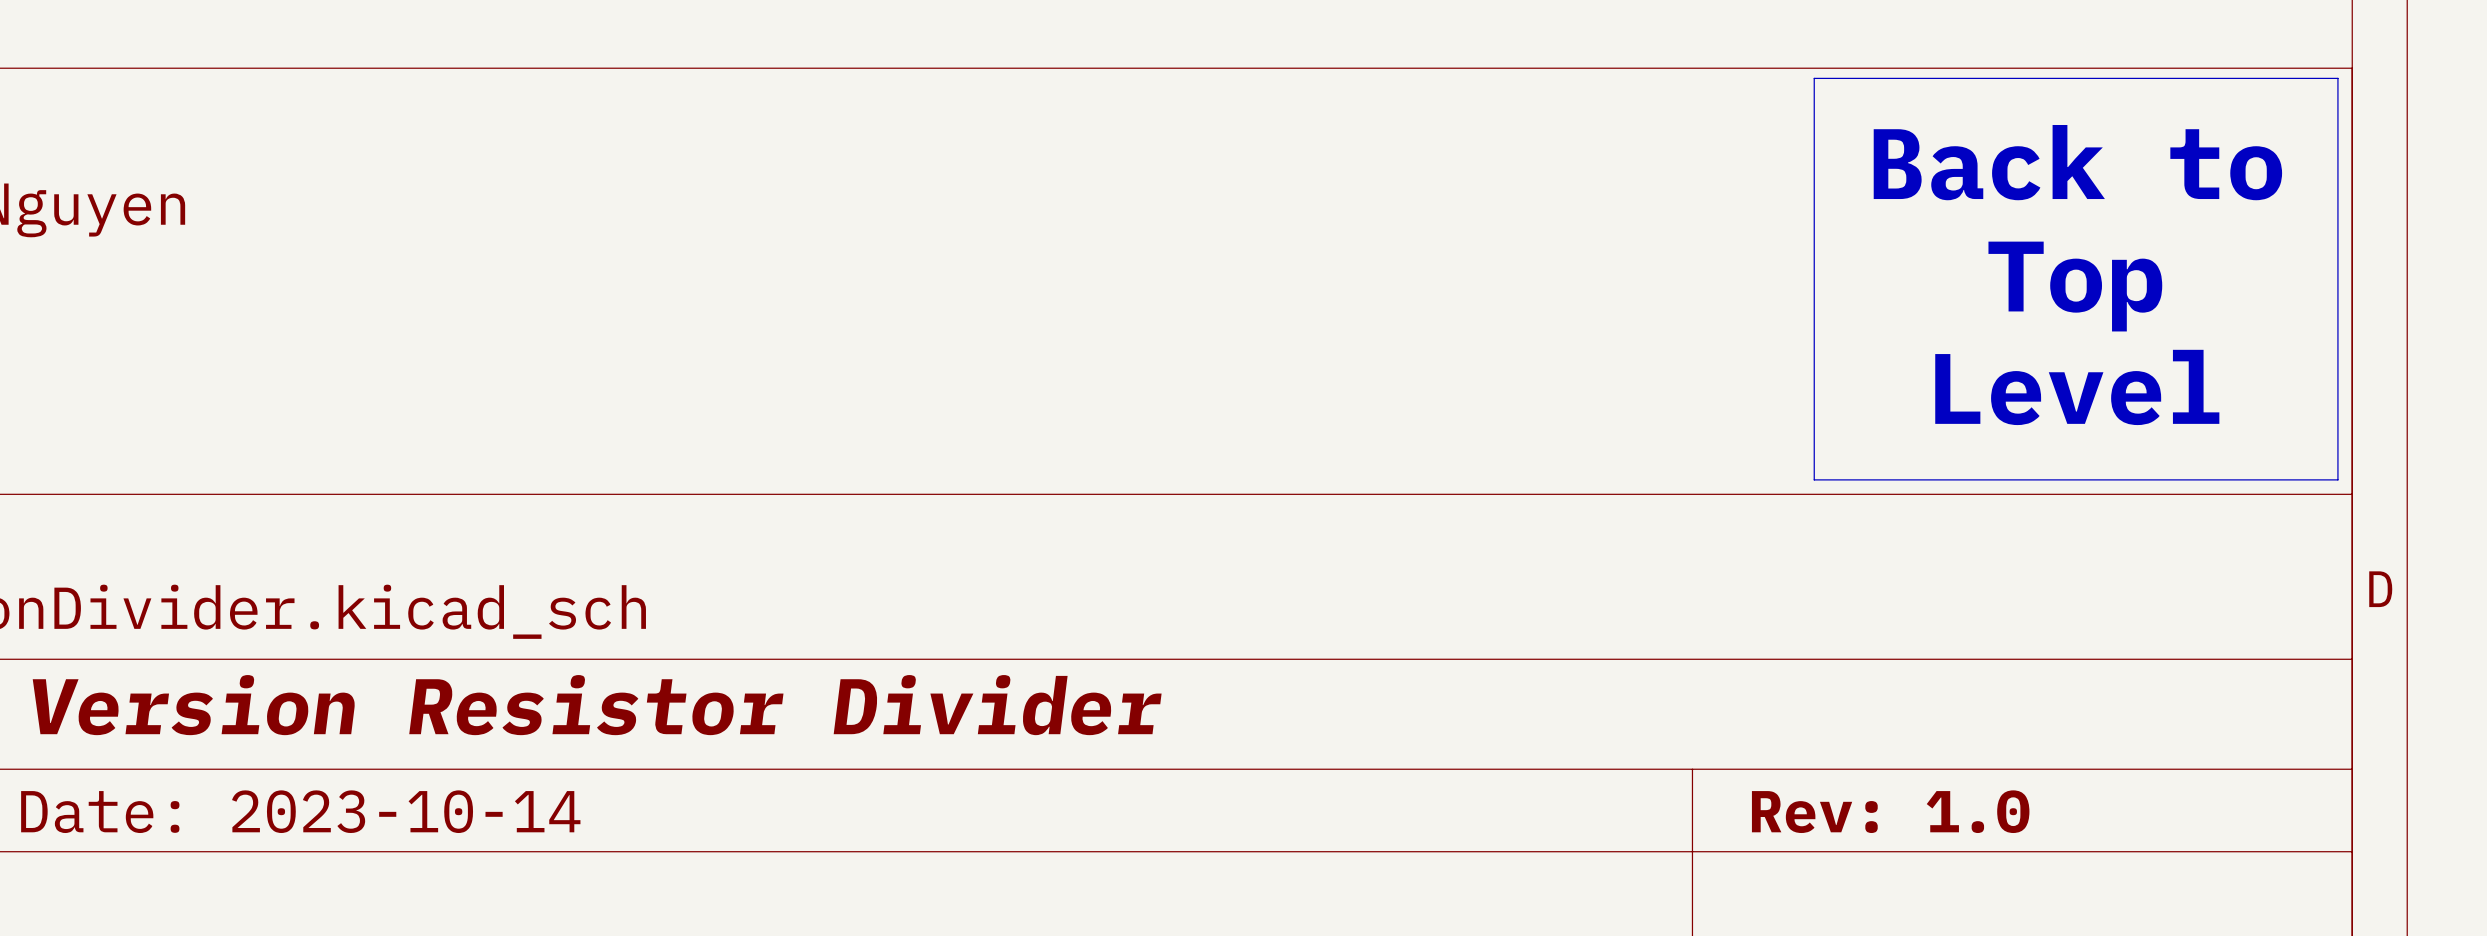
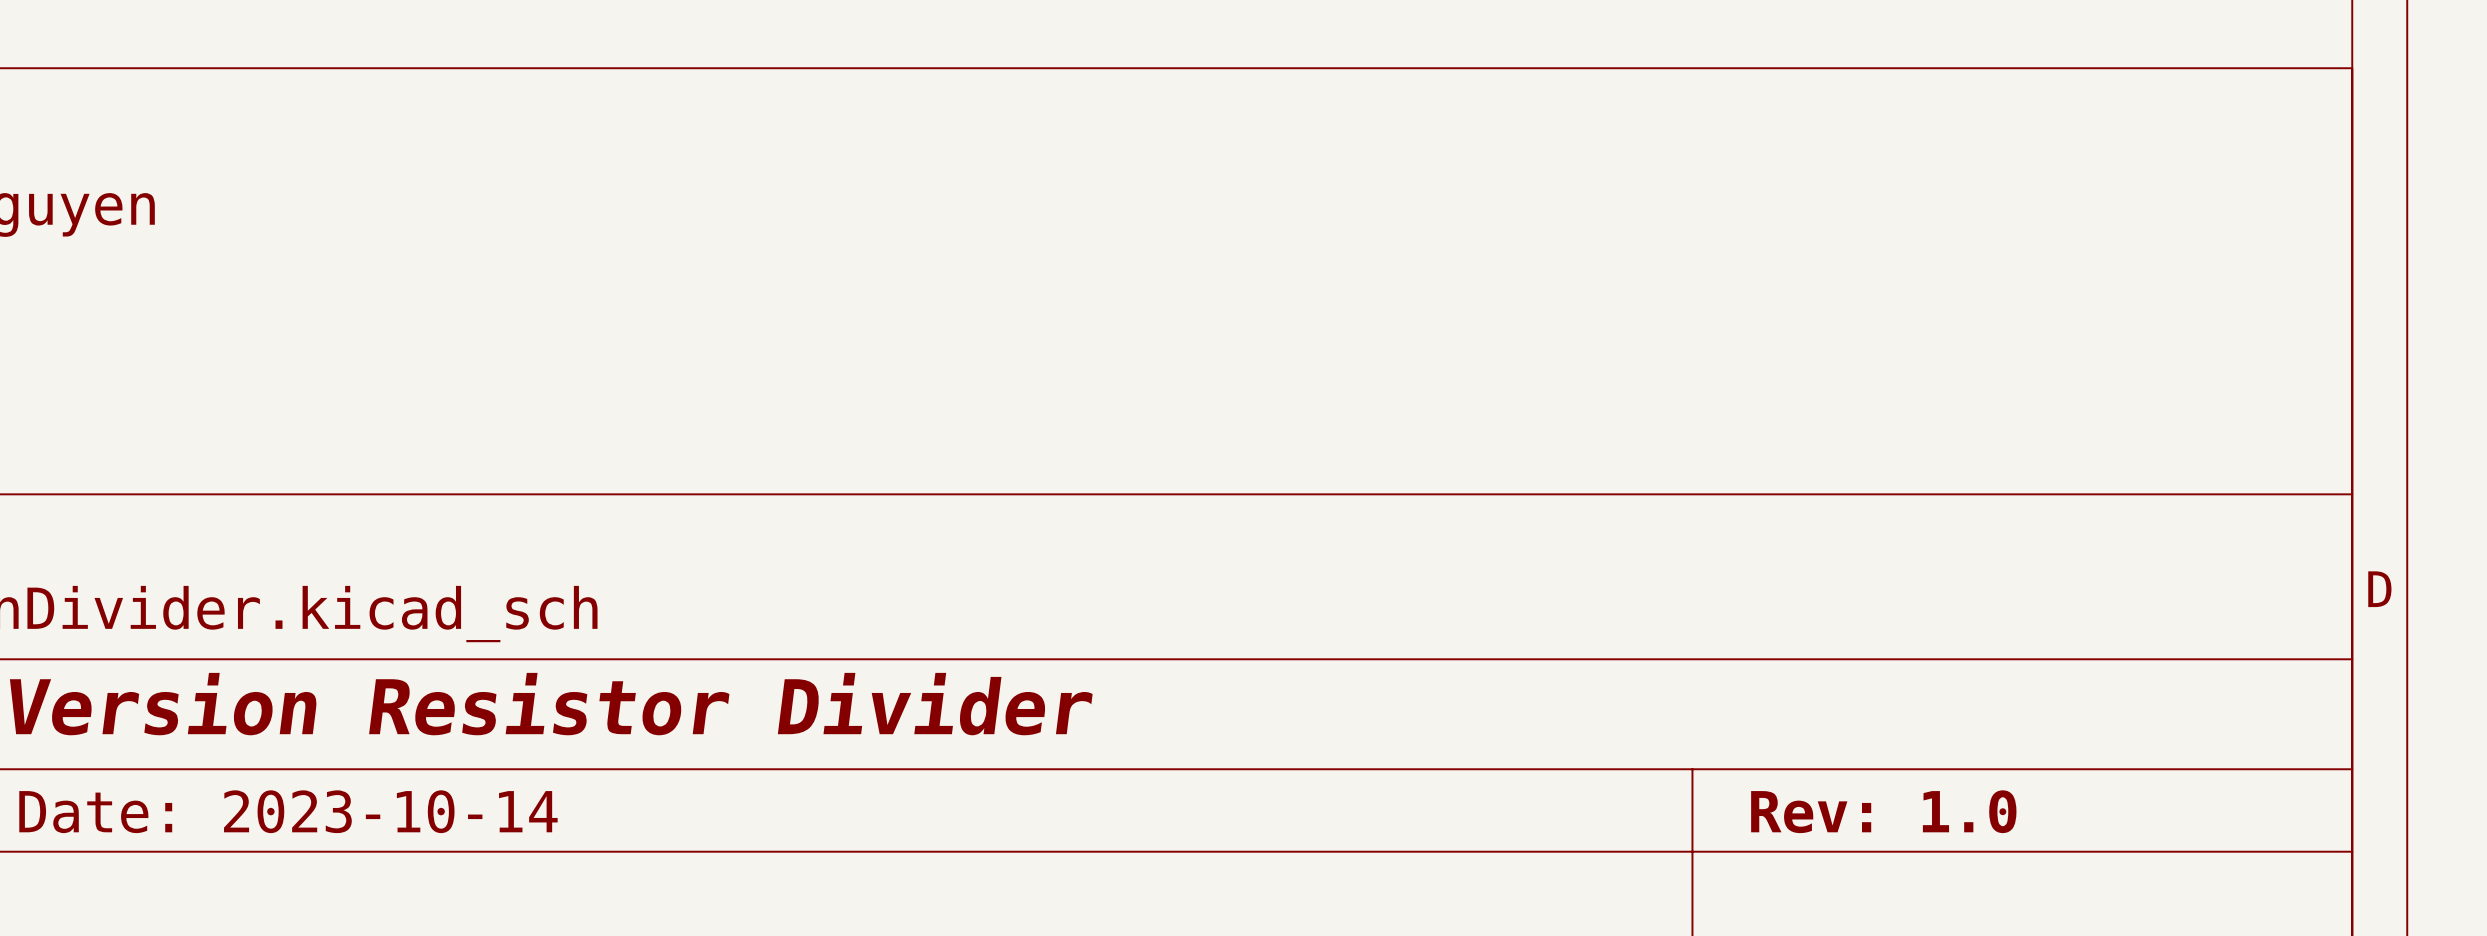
line: (1814, 78) (2337, 78) (2337, 479) (1814, 479) (1814, 78) -> none
text: Back to (2077, 162) -> none
text: Top (2075, 286) -> none
text: Level (2077, 387) -> none

